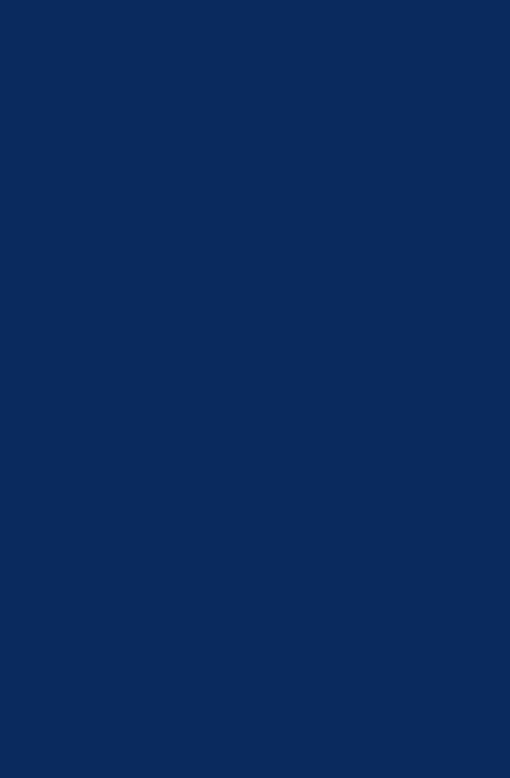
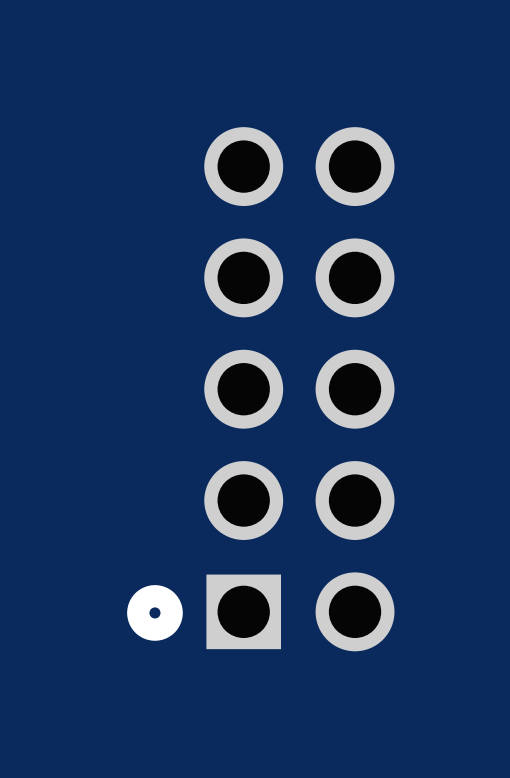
part: none -> (260, 389)

